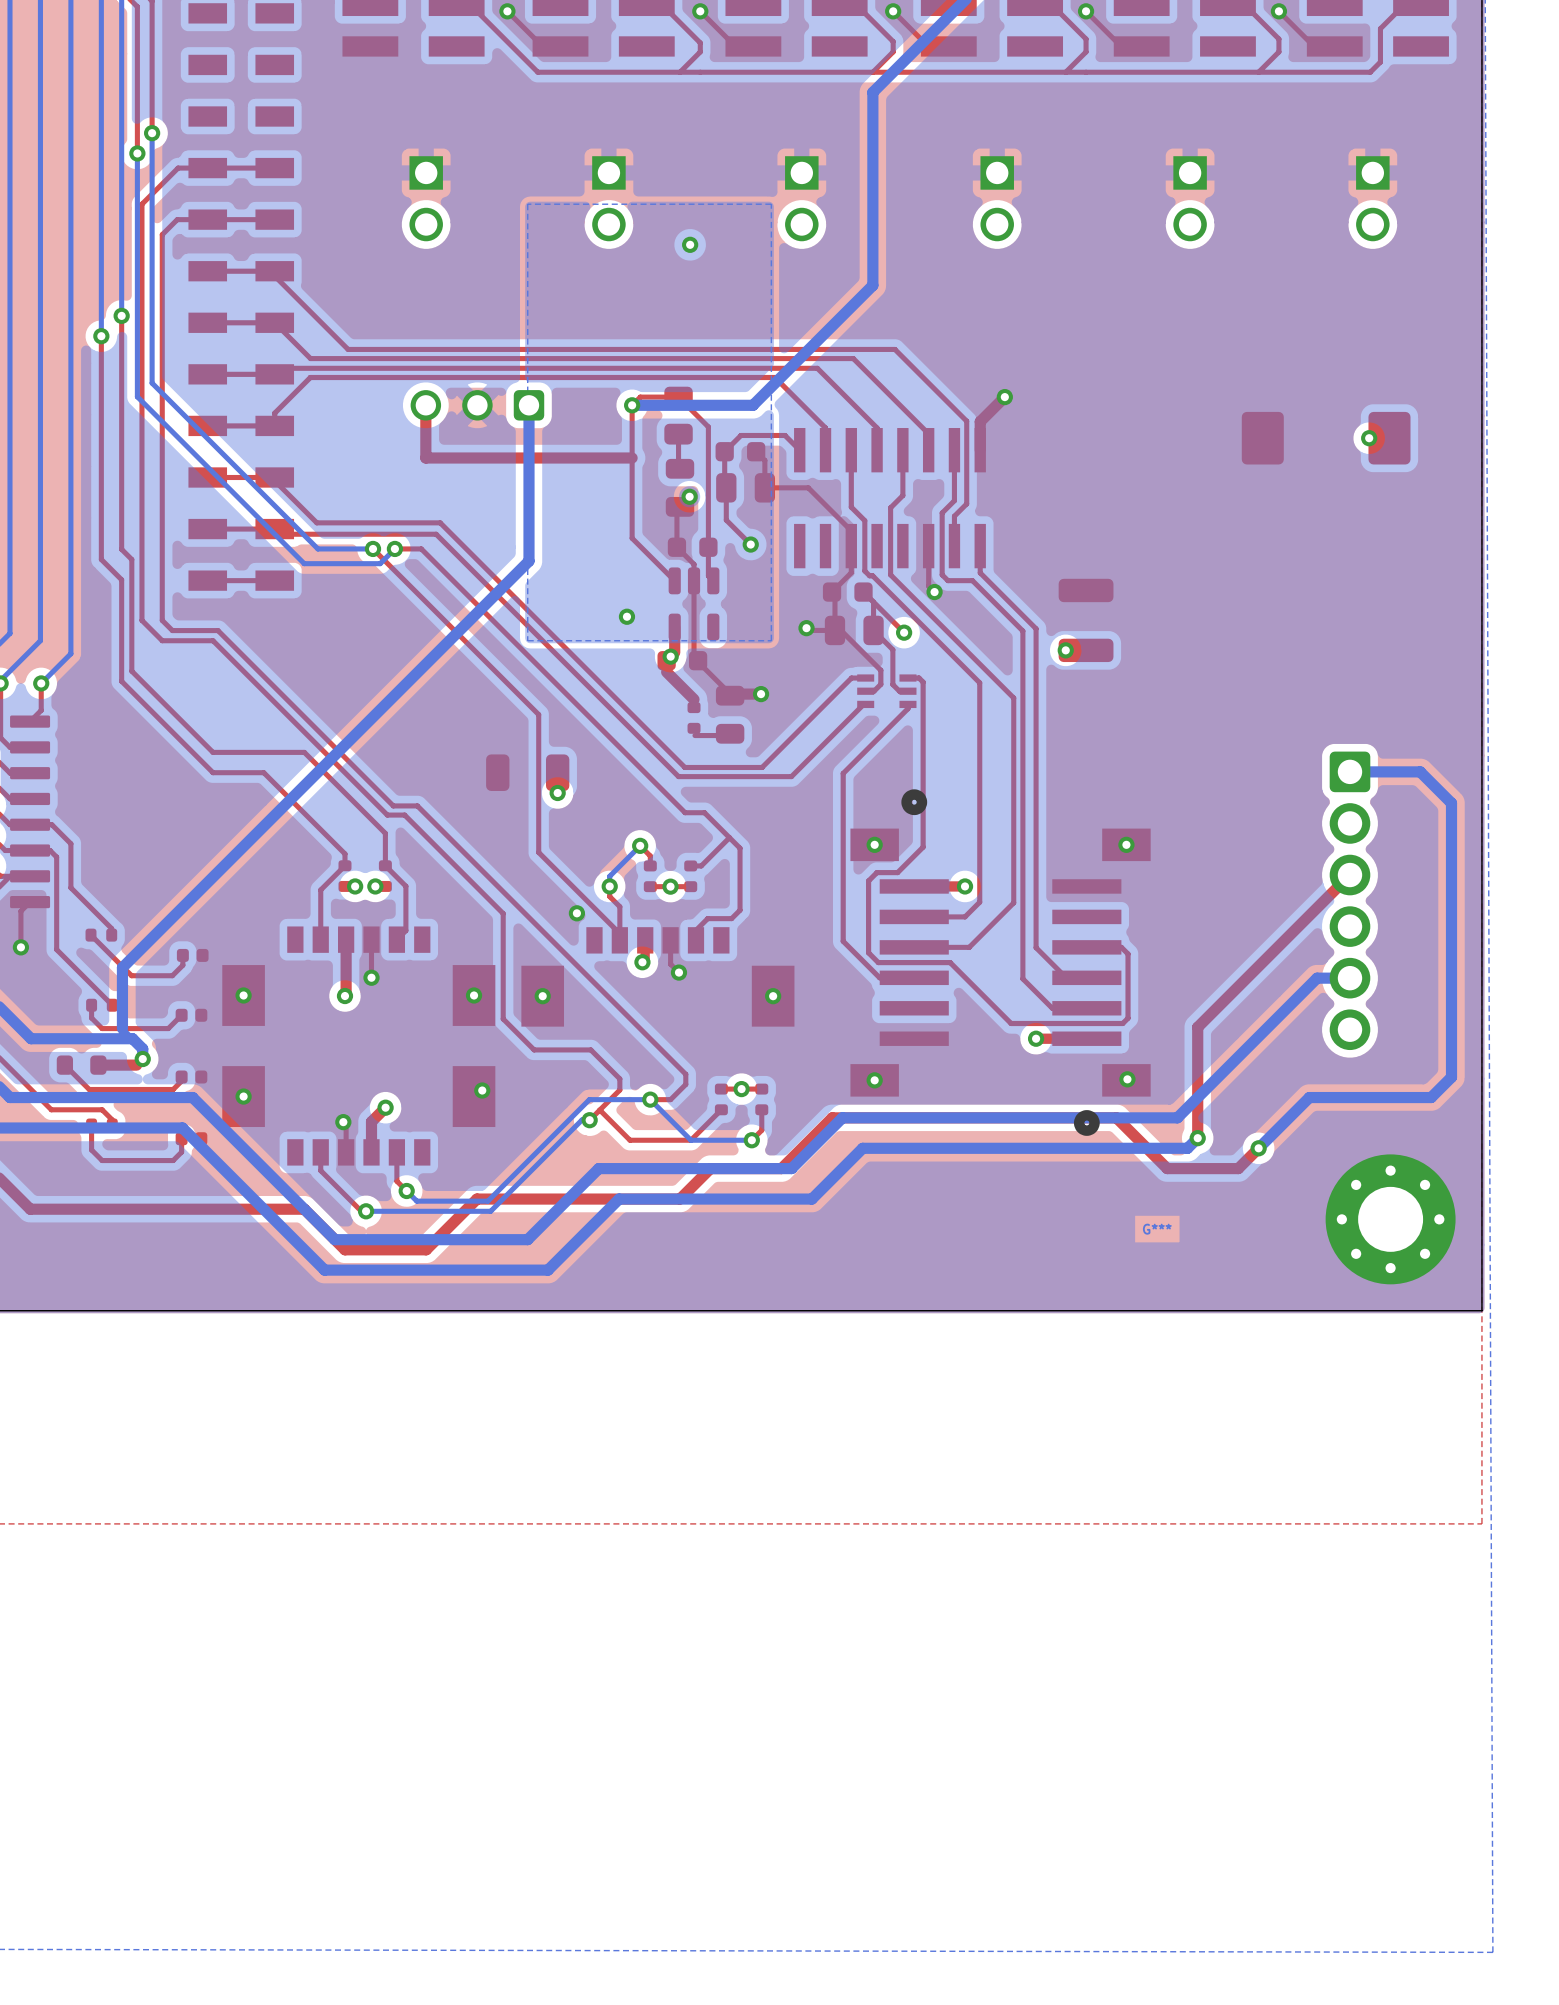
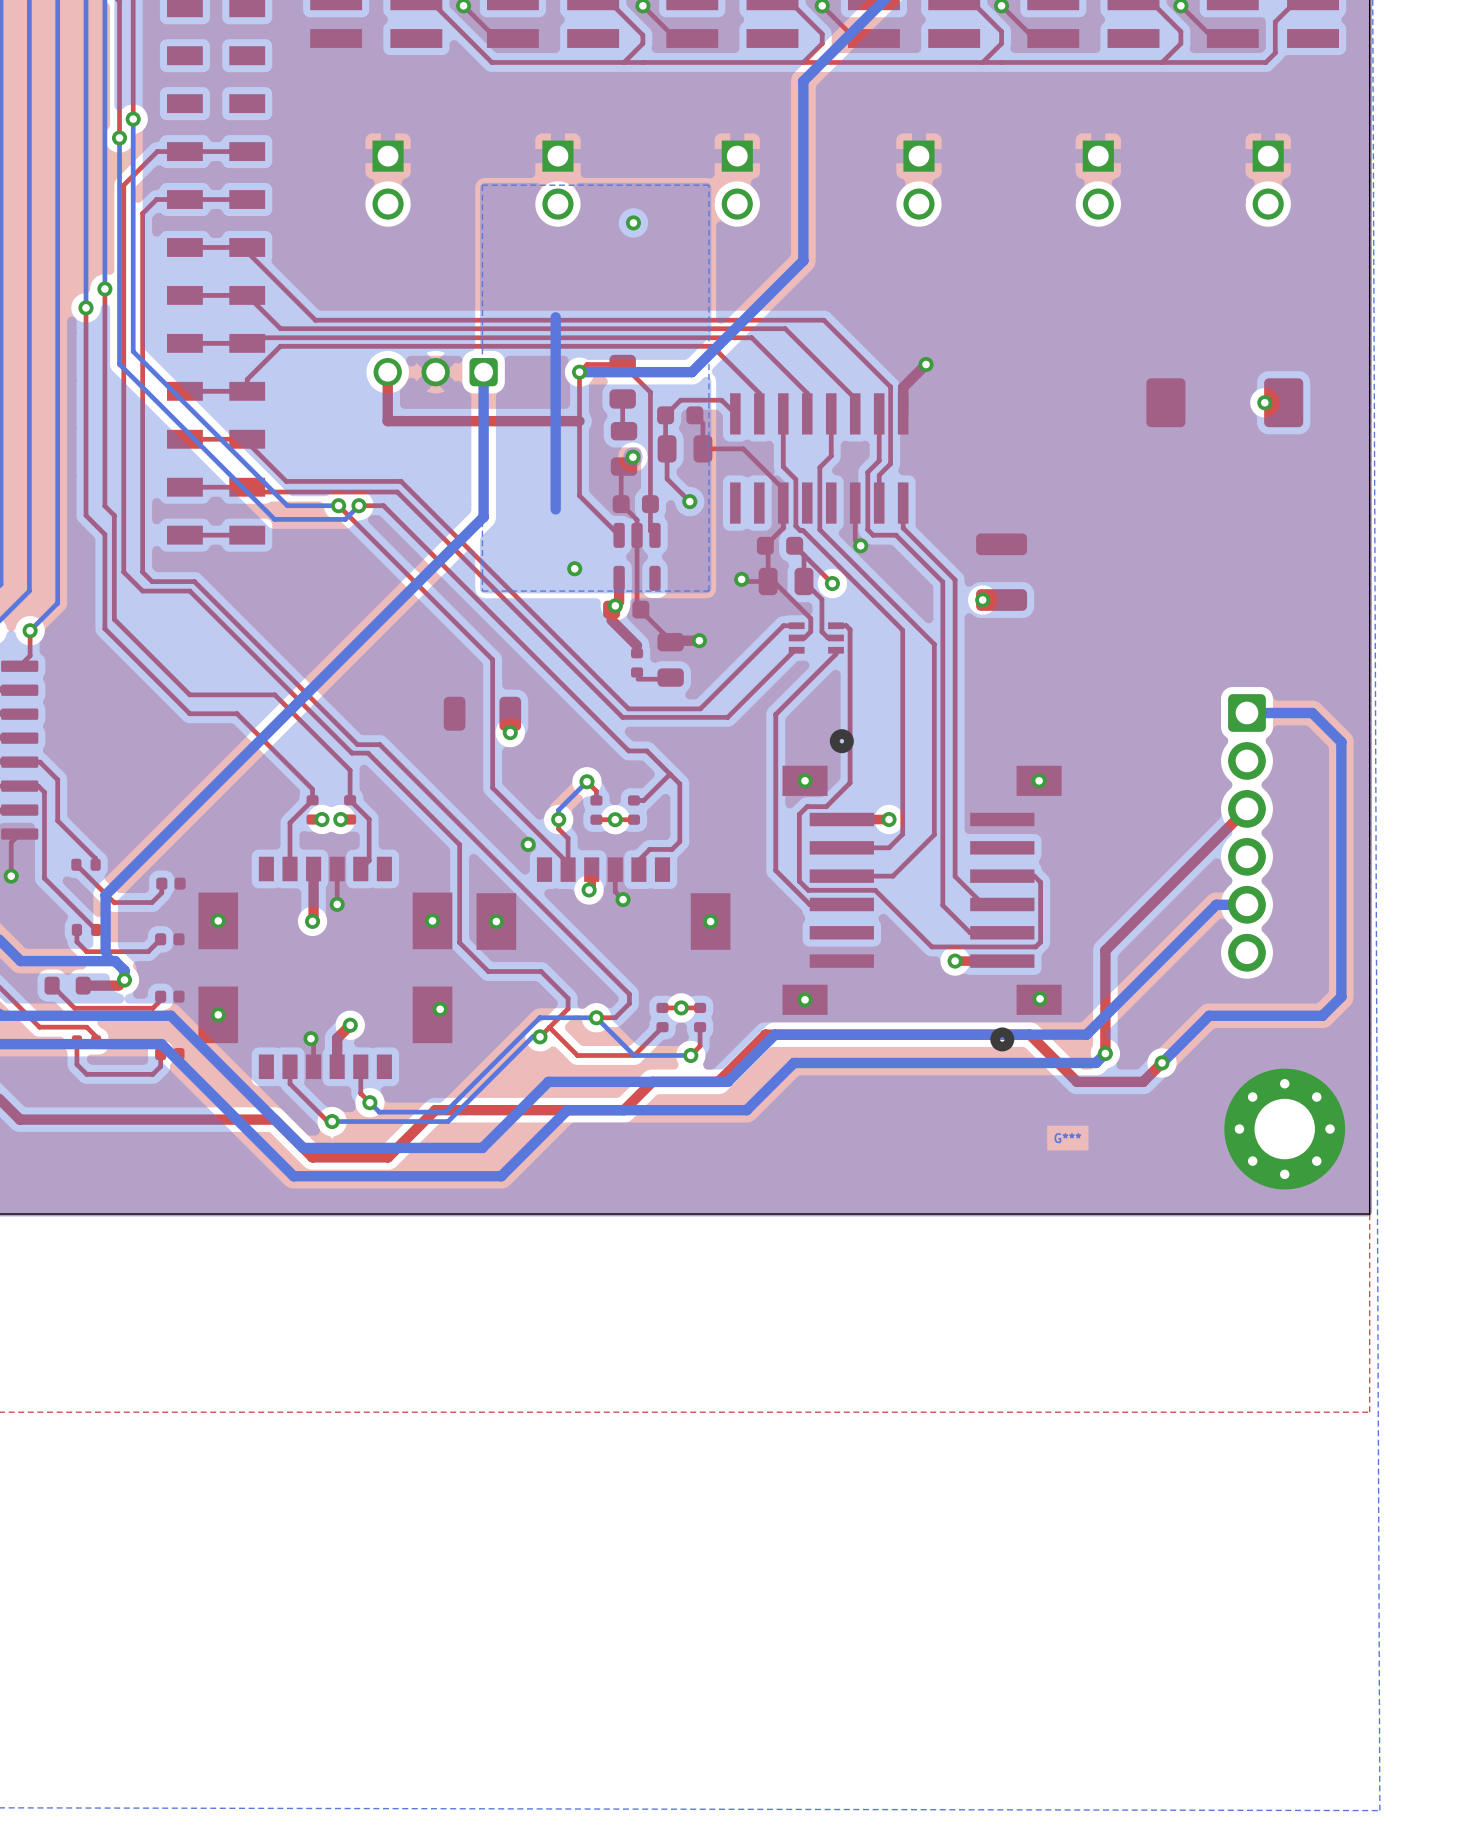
bottom track: none -> (555, 317) (555, 509)

